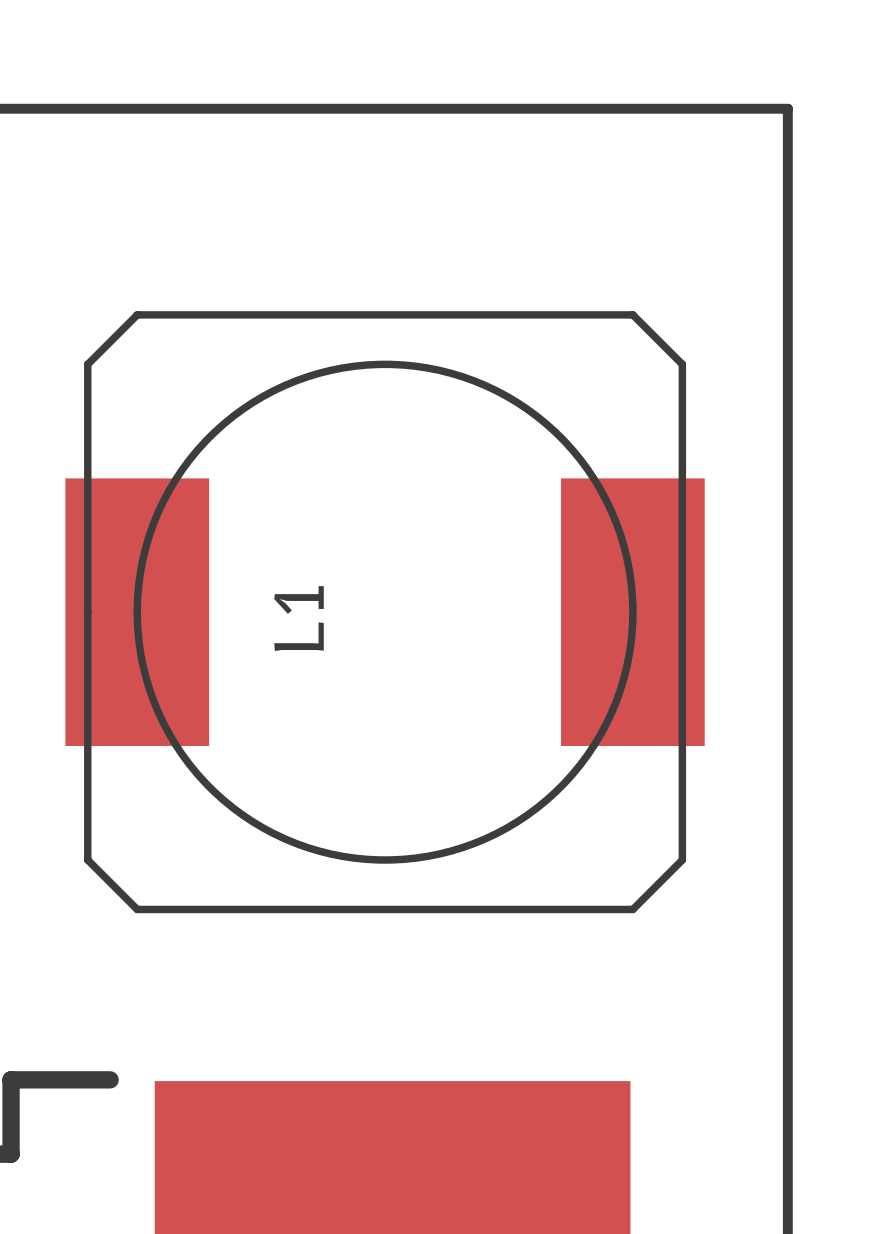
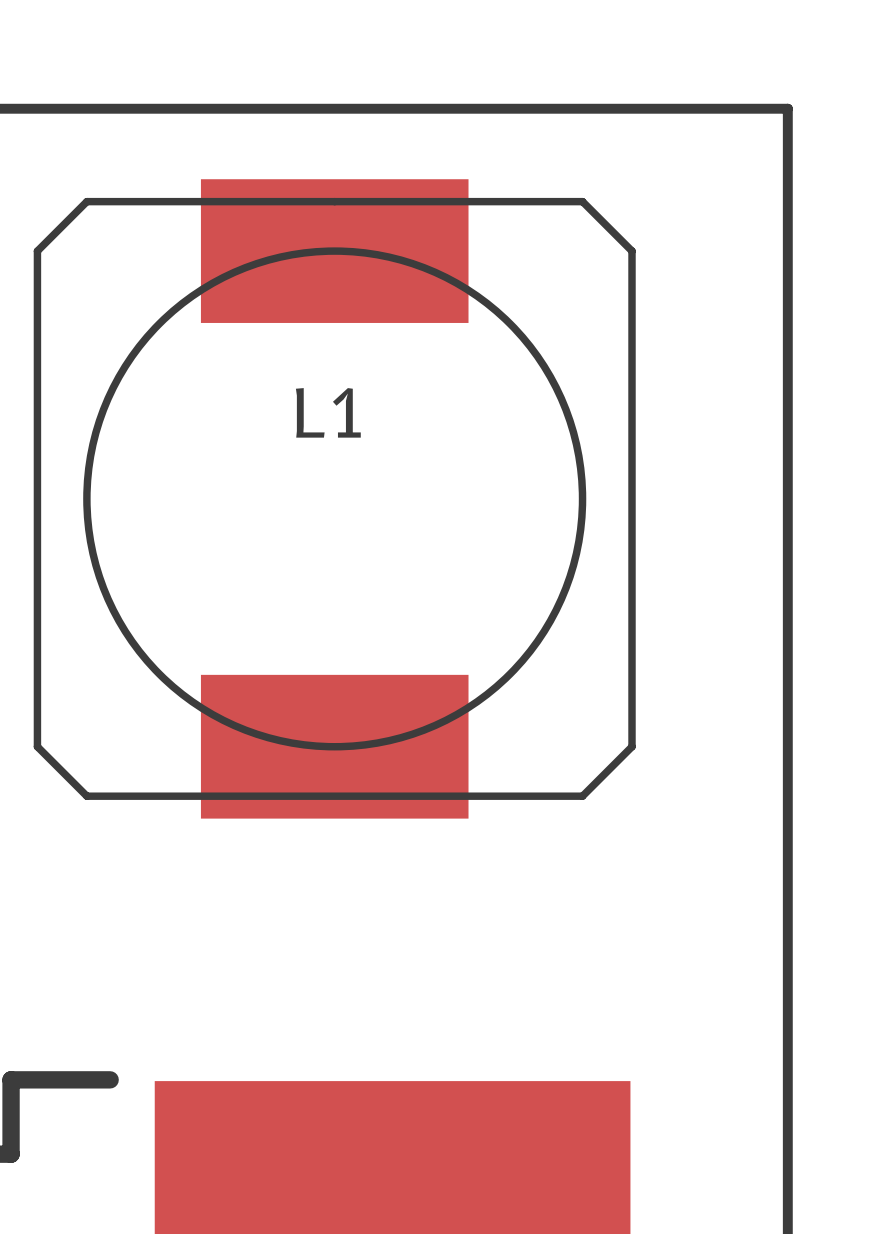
L1 rotation: 0° (385, 612) -> 90° clockwise (334, 498)

